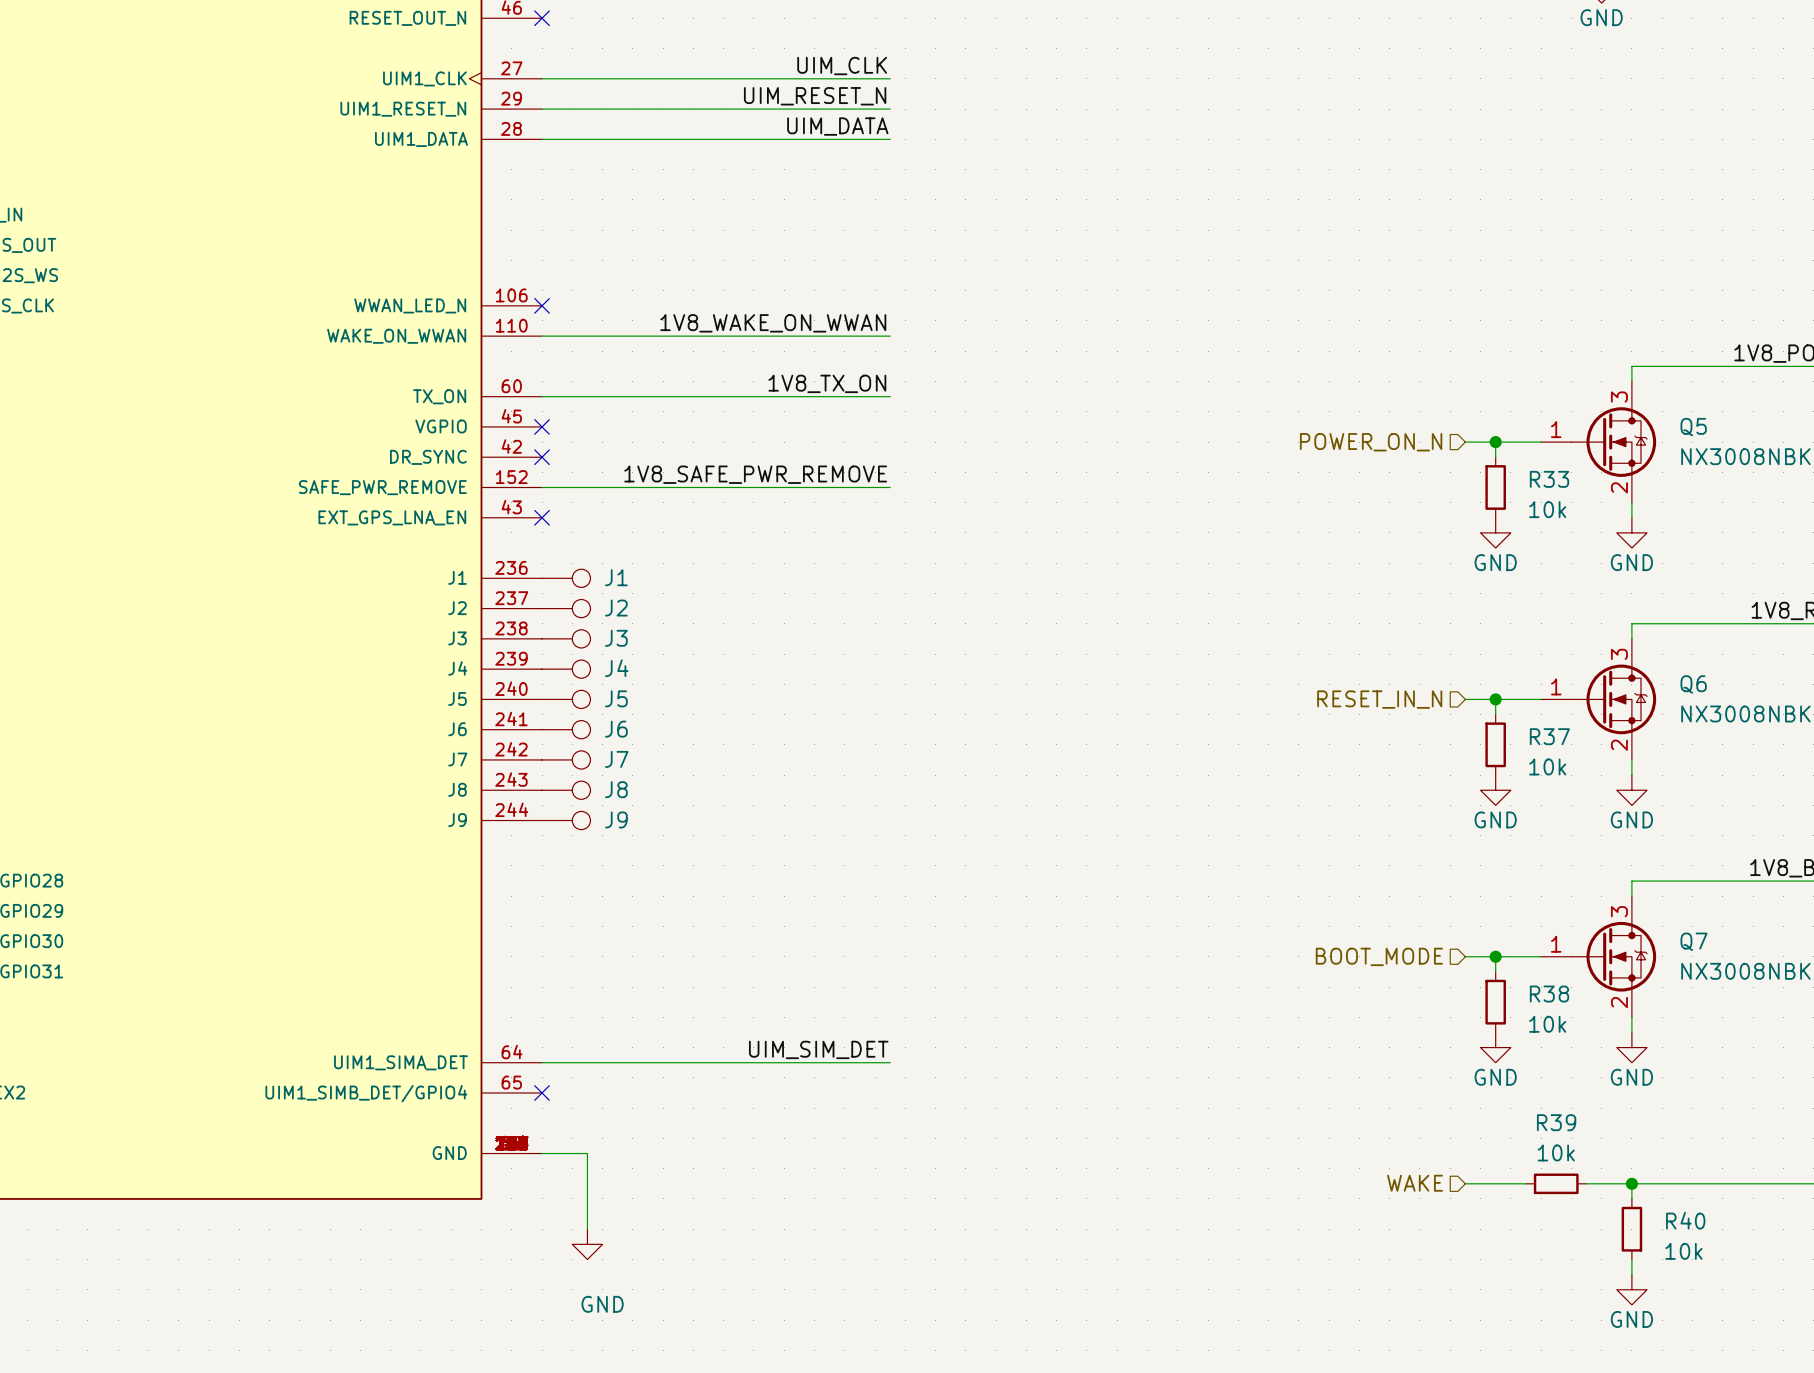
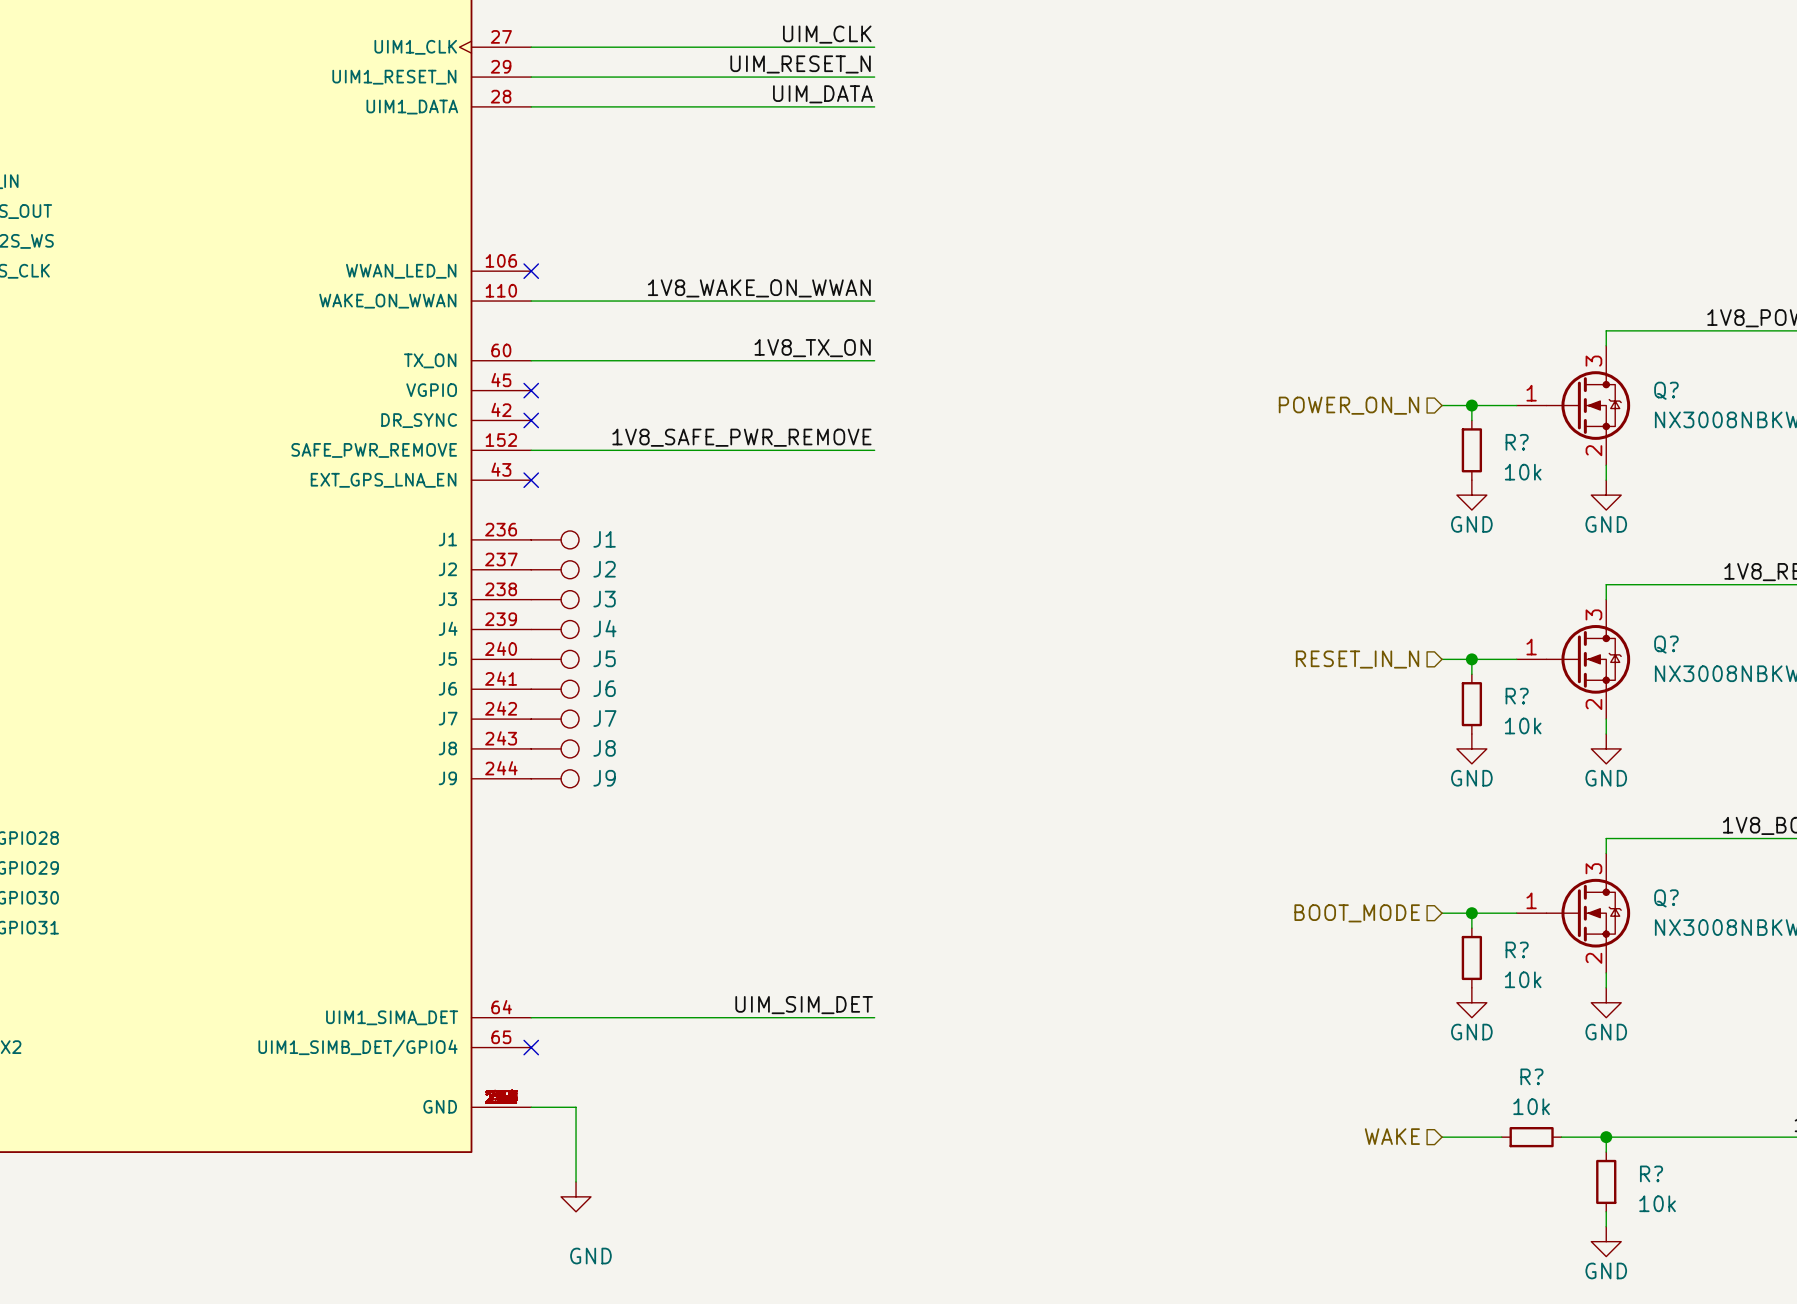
Q5 name: Q5 (1693, 427) -> Q? (1666, 390)
R33 name: R33 (1549, 479) -> R? (1517, 442)
Q6 name: Q6 (1693, 684) -> Q? (1666, 644)
R37 name: R37 (1549, 736) -> R? (1517, 696)
Q7 name: Q7 (1694, 941) -> Q? (1666, 898)
R38 name: R38 (1549, 994) -> R? (1517, 949)
R39 name: R39 (1556, 1122) -> R? (1531, 1076)
R40 name: R40 (1685, 1220) -> R? (1651, 1173)

